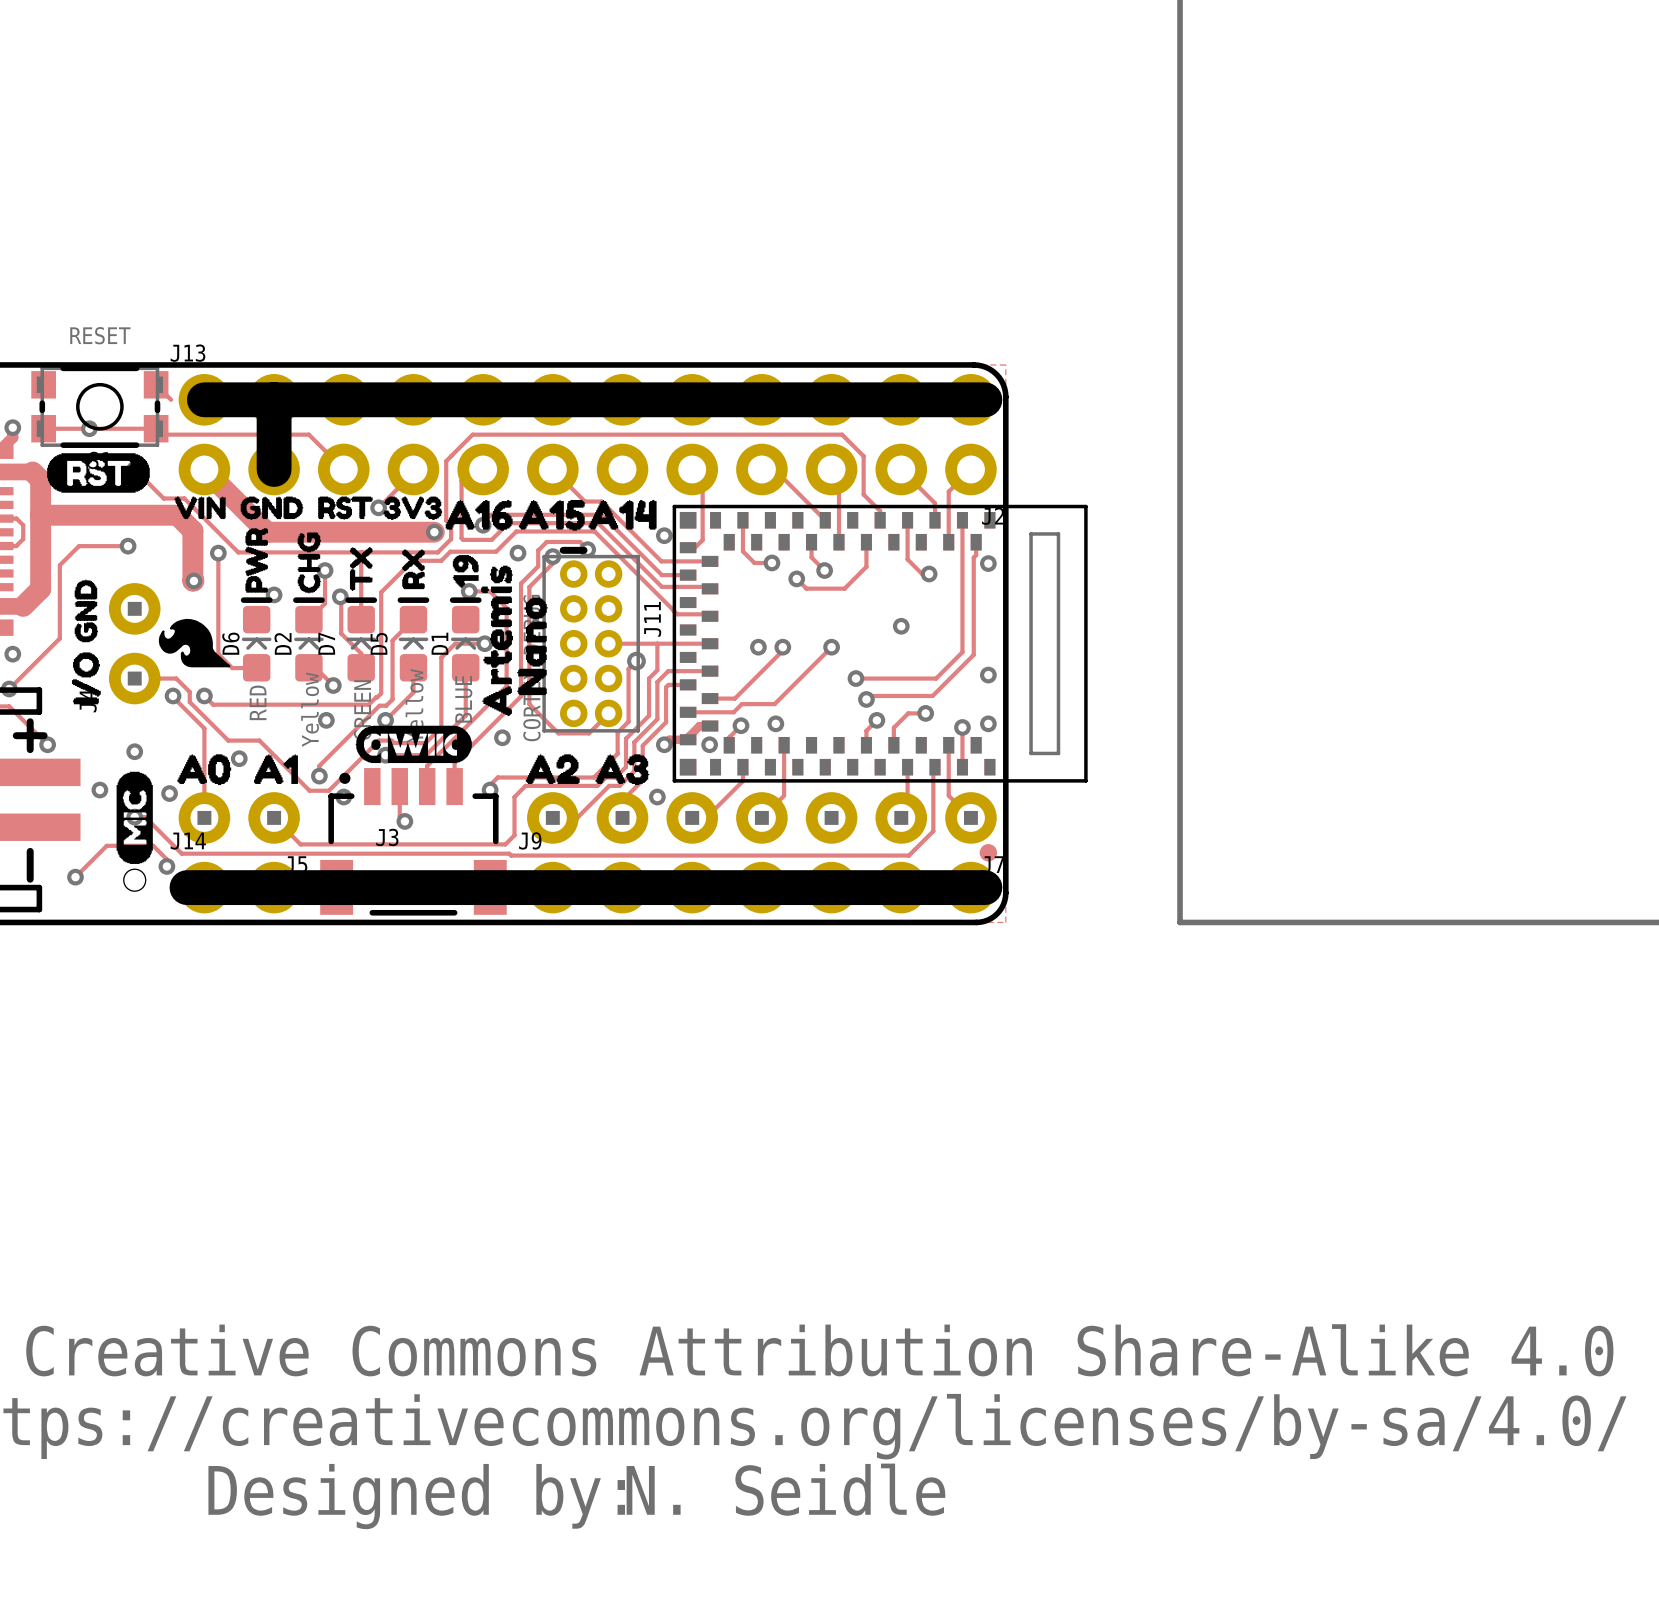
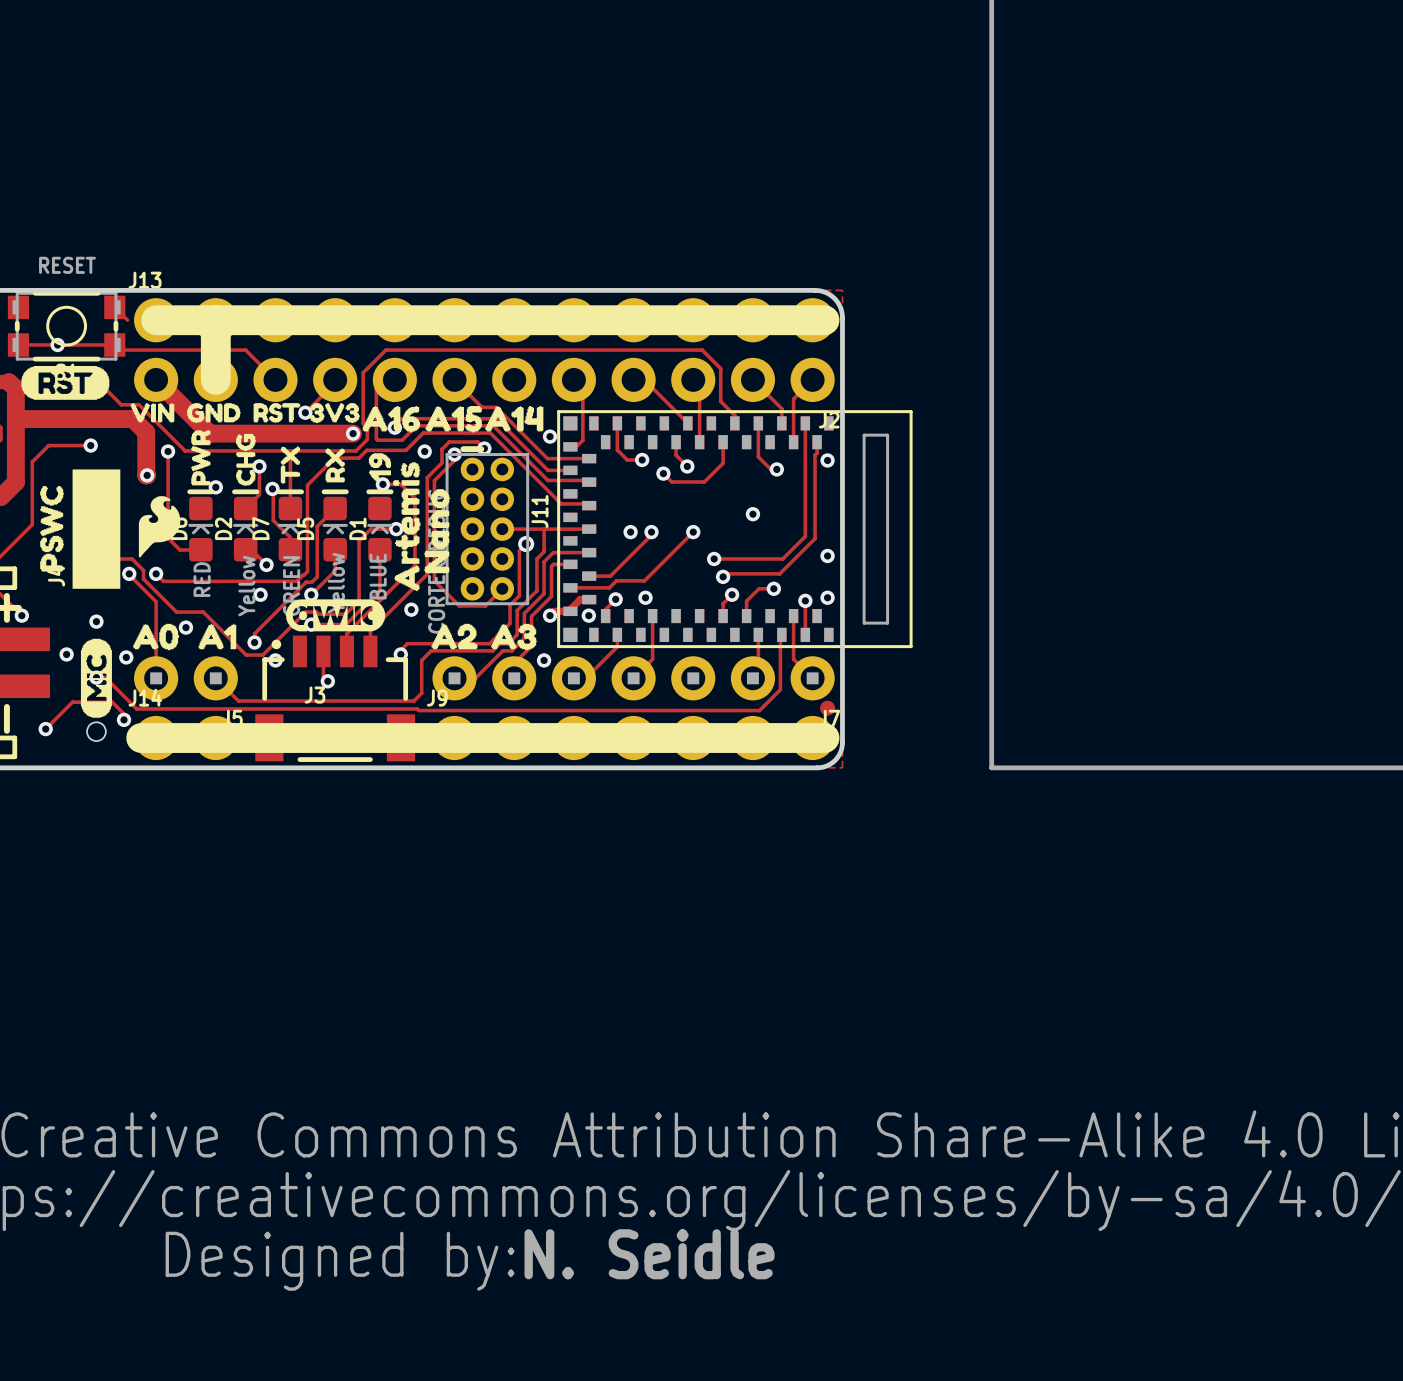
drawing: none -> [40, 469, 121, 589]
drawing: [71, 579, 101, 705] -> none
drawing shape: [158, 618, 231, 668] -> [138, 496, 181, 558]

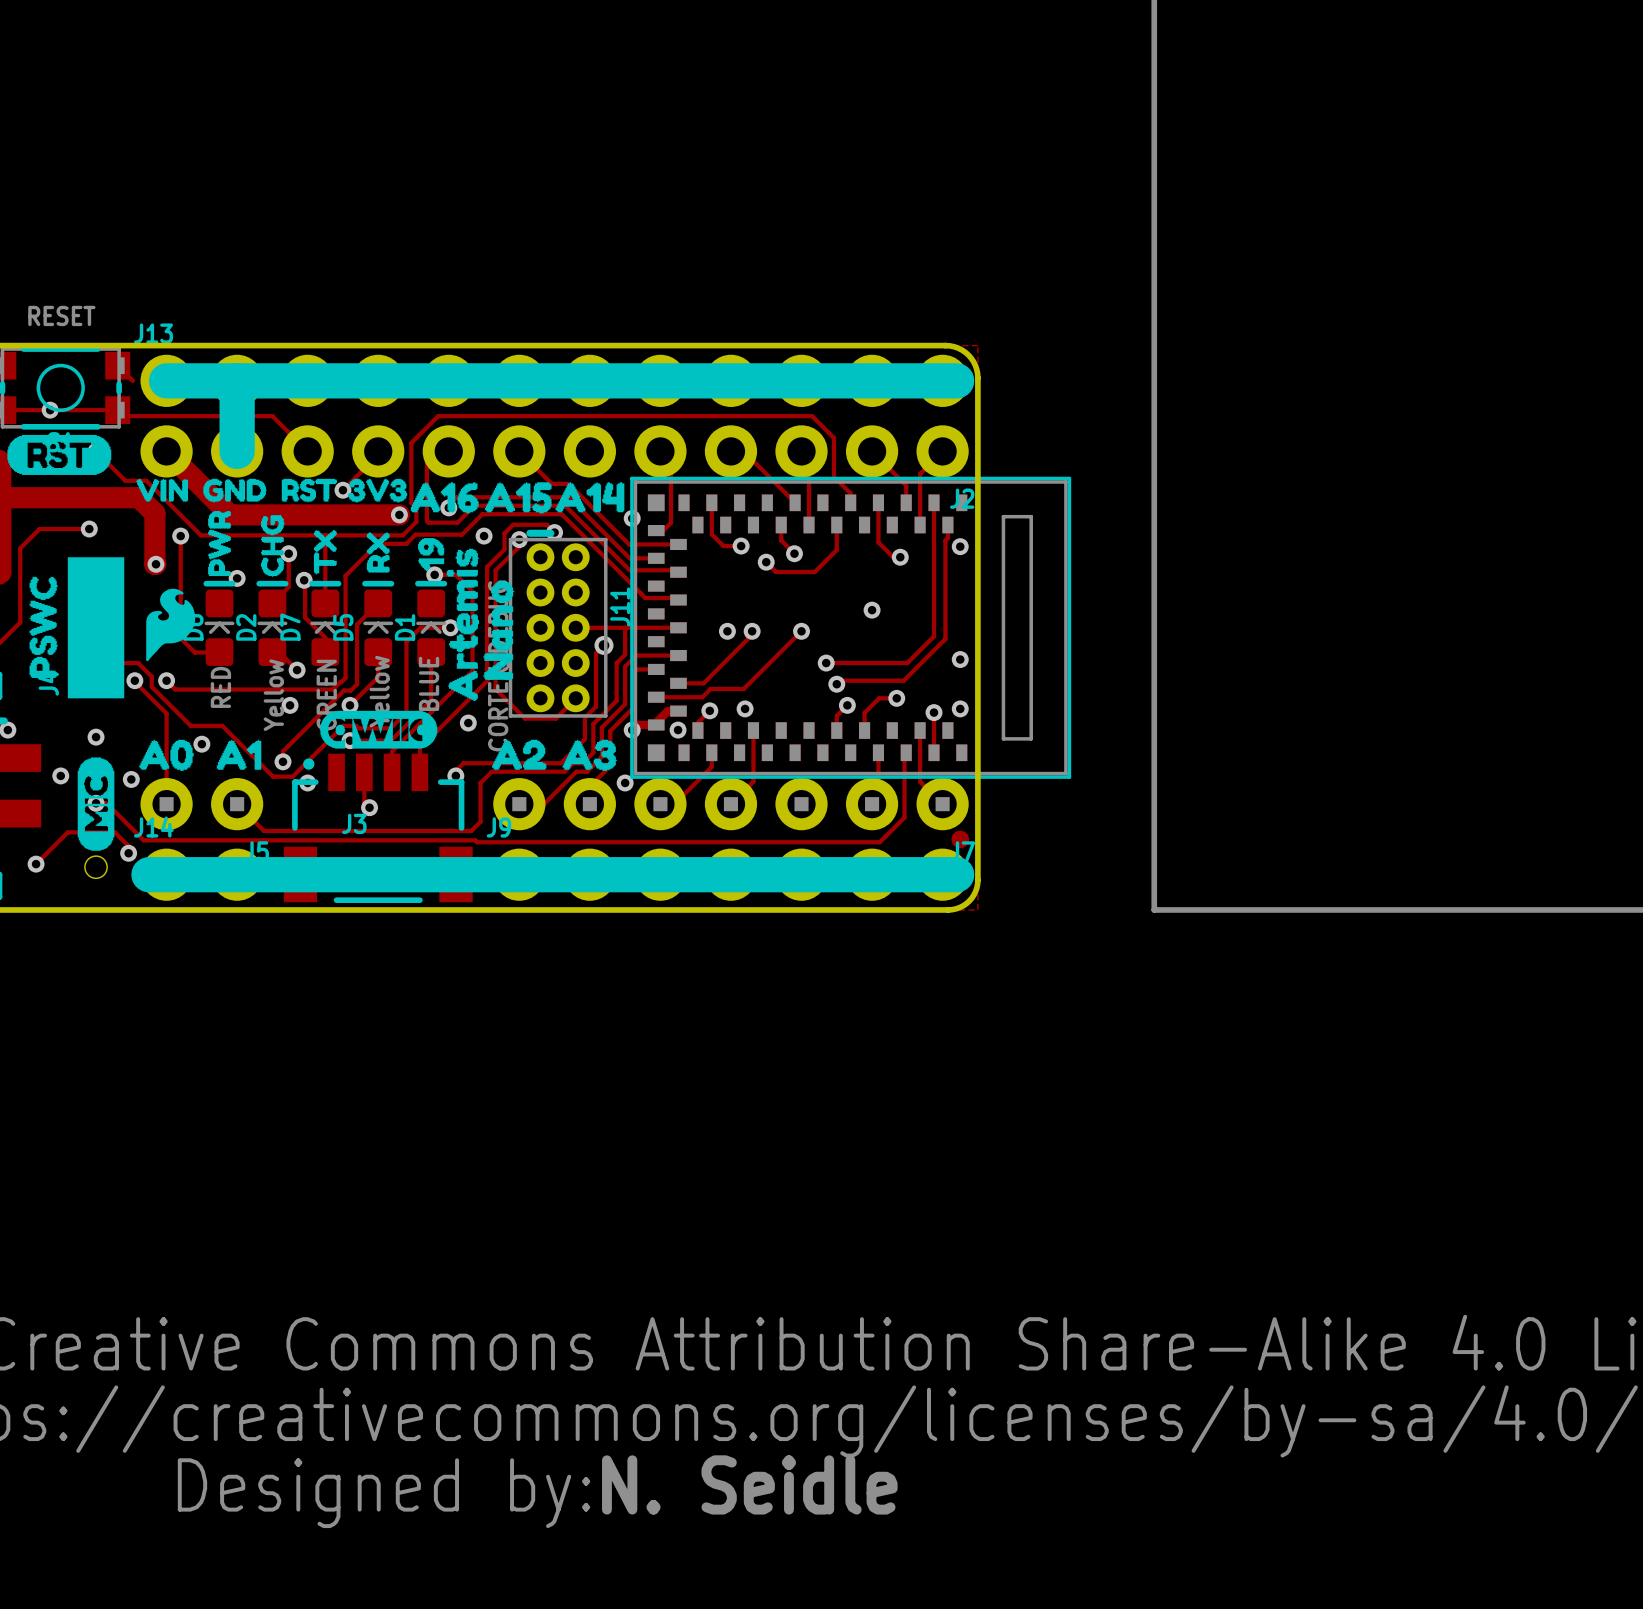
part footprint: [557, 410, 913, 649] -> [630, 476, 1072, 779]

